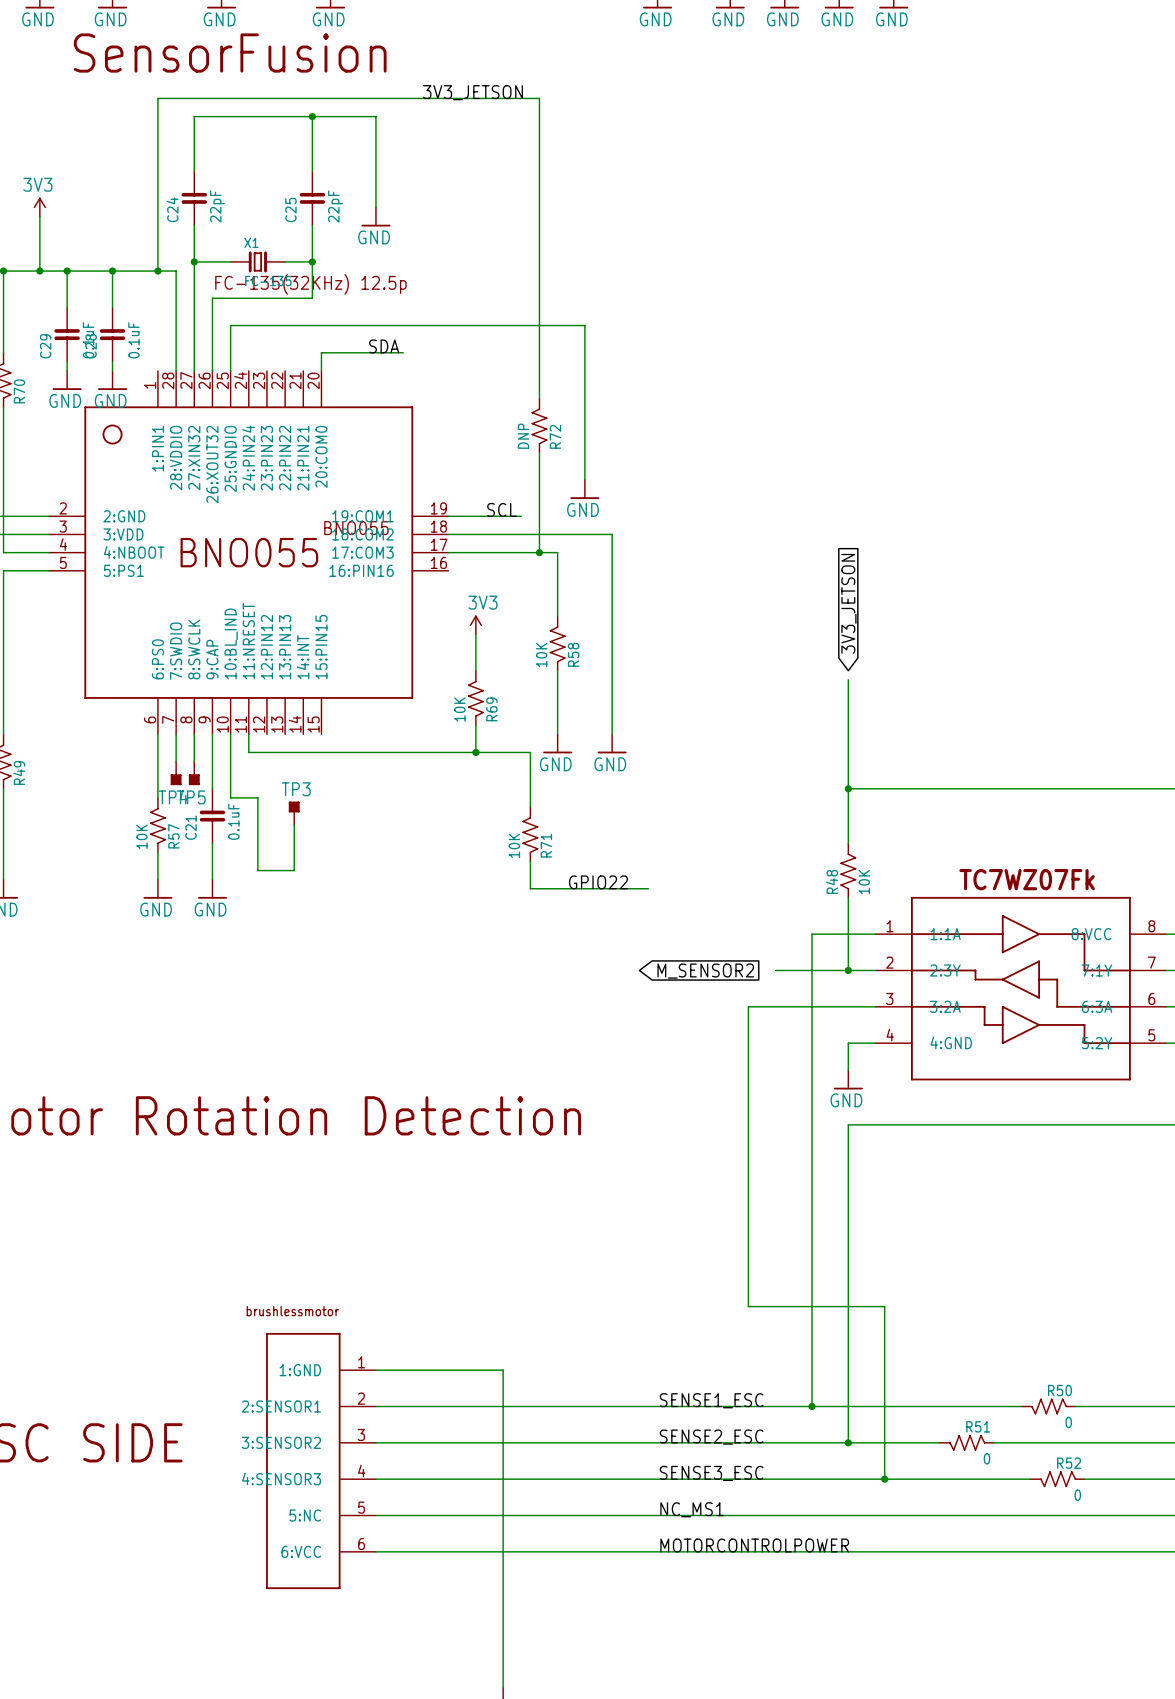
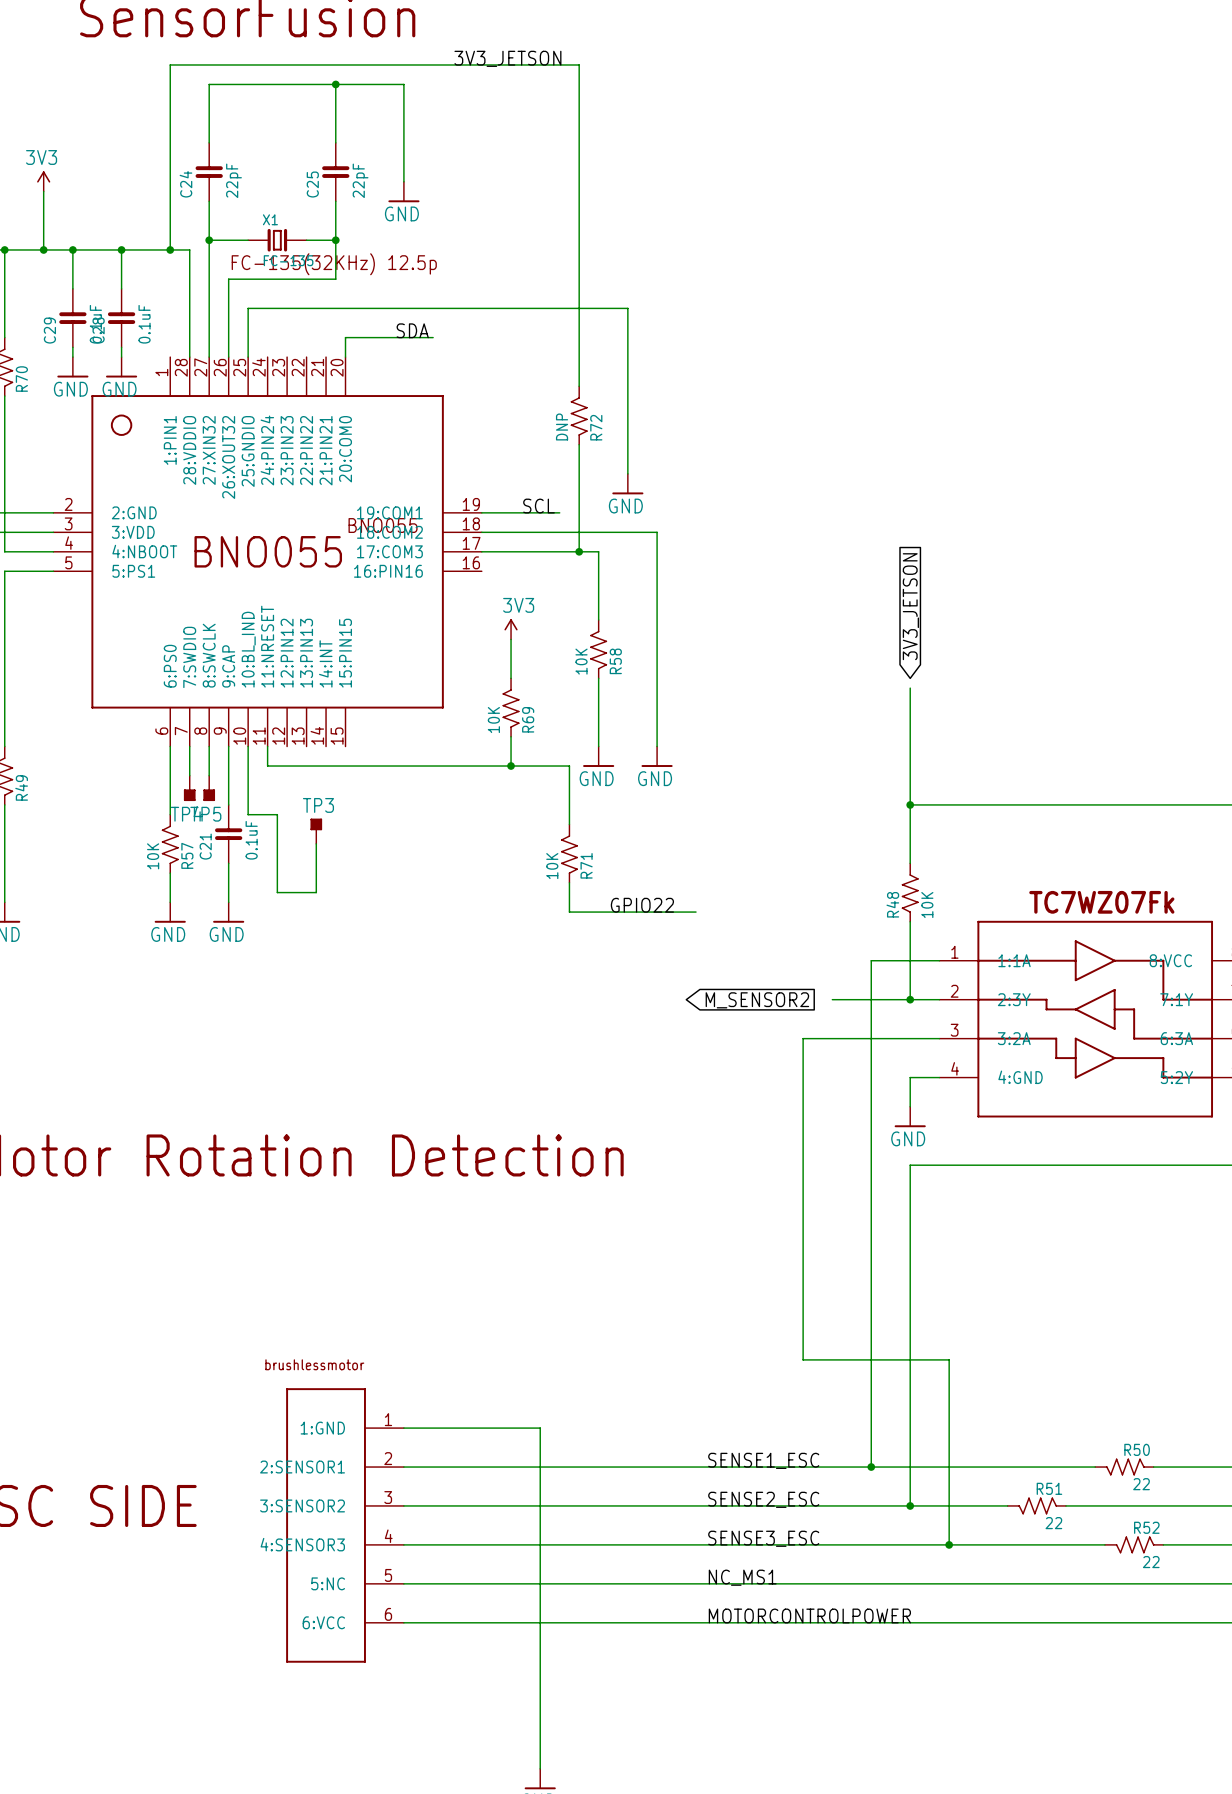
R50 value: 0 (1068, 1422) -> 22 (1141, 1484)
R51 value: 0 (986, 1458) -> 22 (1053, 1523)
R52 value: 0 (1077, 1495) -> 22 (1151, 1562)

